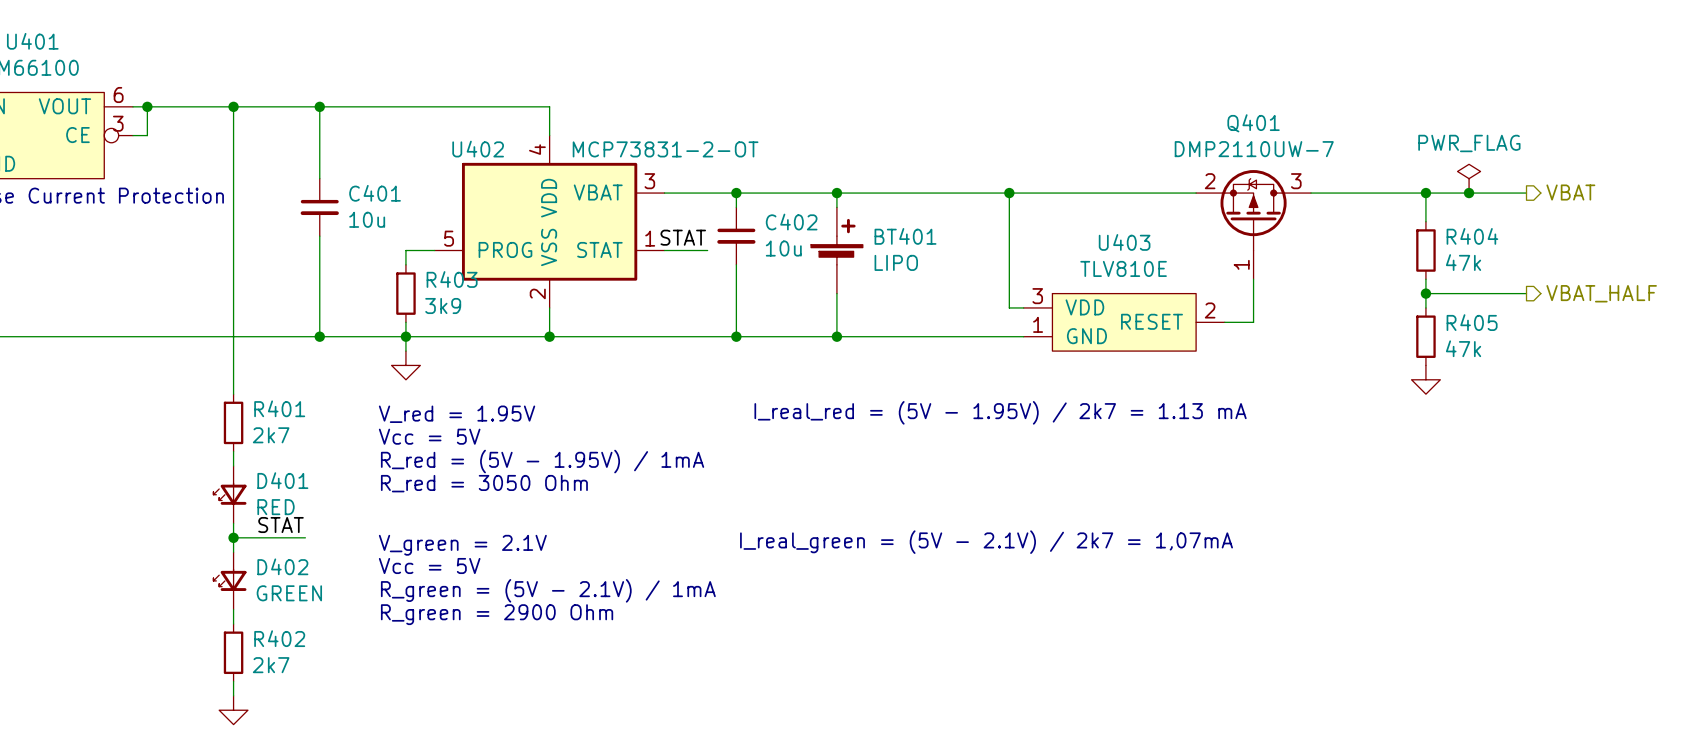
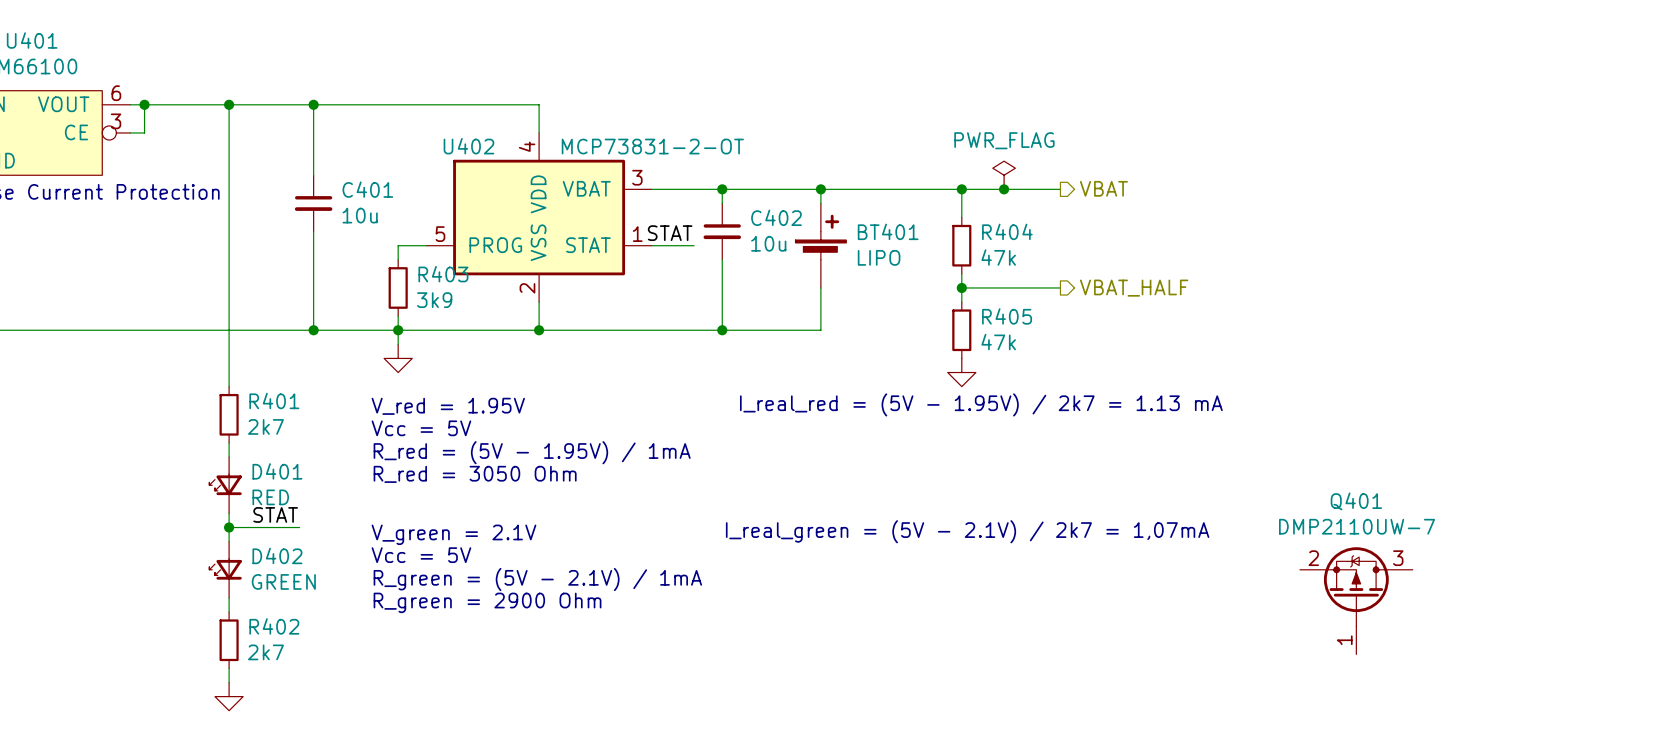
power symbol: none -> PWR_FLAG (1004, 175)
power symbol: PWR_FLAG (1469, 178) -> none
hierarchical label: none -> VBAT (1103, 188)
hierarchical label: VBAT (1570, 192) -> none
wire: none -> (961, 189) (961, 217)
junction: none -> (961, 189)
wire: (1009, 193) (1009, 307) (1023, 307) -> none
junction: (1009, 193) -> none
junction: none -> (1004, 189)
wire: (1081, 193) (1196, 193) -> none
wire: (1311, 193) (1526, 193) -> none
wire: (1425, 193) (1425, 221) -> none
junction: (1425, 193) -> none
junction: (1469, 193) -> none
Q401 position: (1253, 224) -> (1356, 600)
R404 position: (1425, 250) -> (961, 245)
wire: none -> (961, 273) (961, 302)
wire: (1253, 279) (1253, 322) (1224, 322) -> none
wire: (1425, 279) (1425, 307) -> none
wire: none -> (961, 287) (1060, 287)
junction: none -> (961, 287)
hierarchical label: none -> VBAT_HALF (1134, 288)
wire: (1425, 293) (1526, 293) -> none
junction: (1425, 293) -> none
hierarchical label: VBAT_HALF (1601, 293) -> none
U403: TLV810E (1124, 322) -> none
wire: (836, 336) (1023, 336) -> none
junction: (836, 336) -> none
R405 position: (1425, 336) -> (961, 330)
power symbol: none -> (961, 372)
power symbol: (1425, 379) -> none

